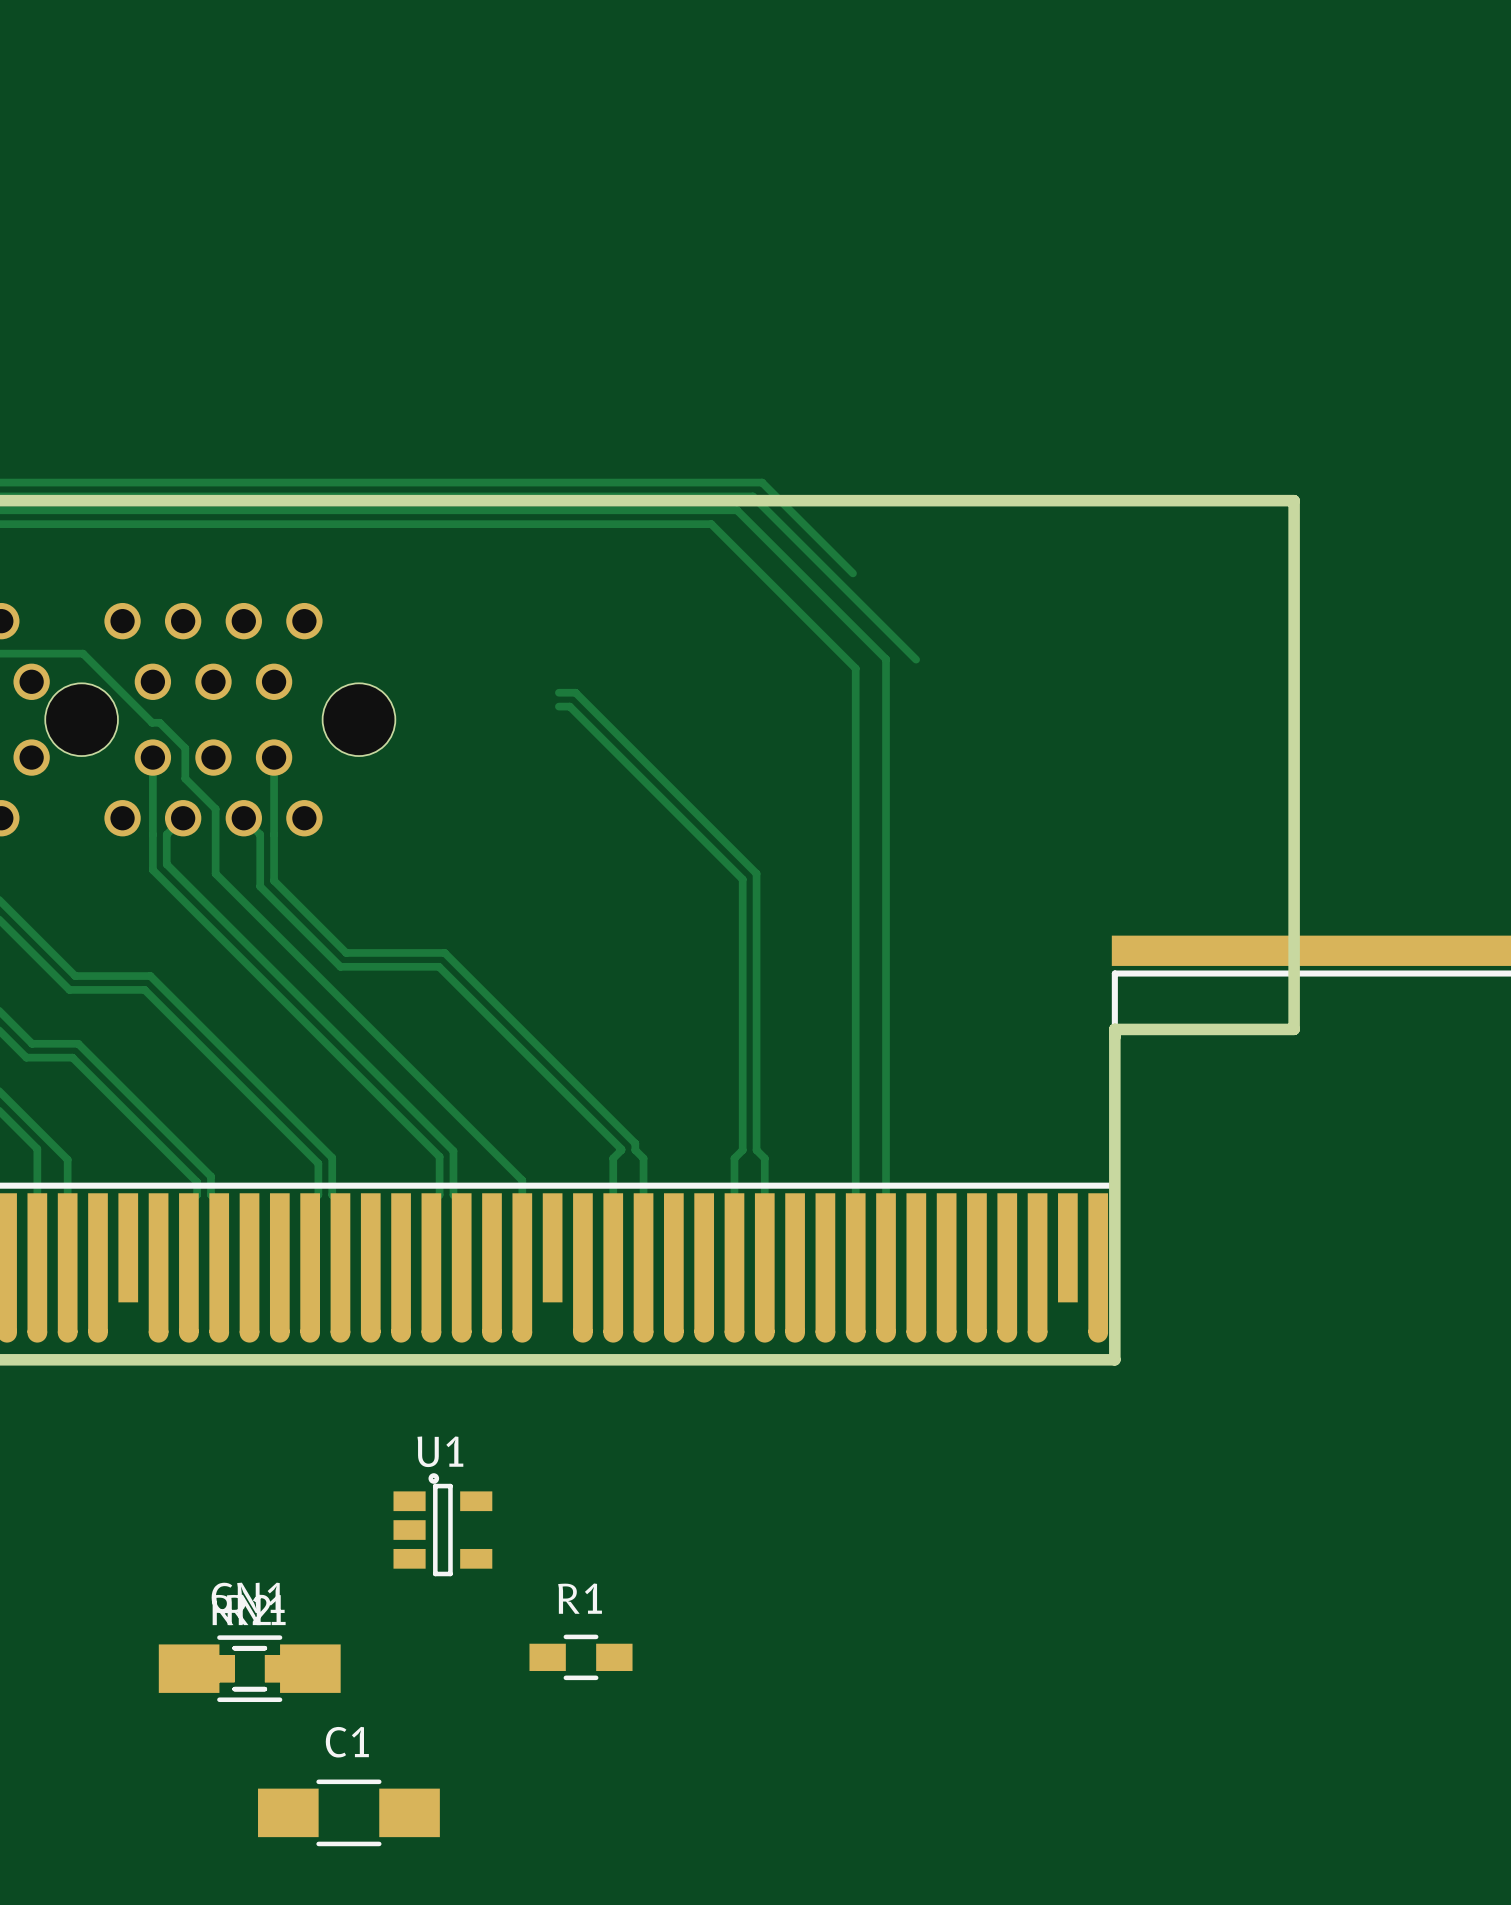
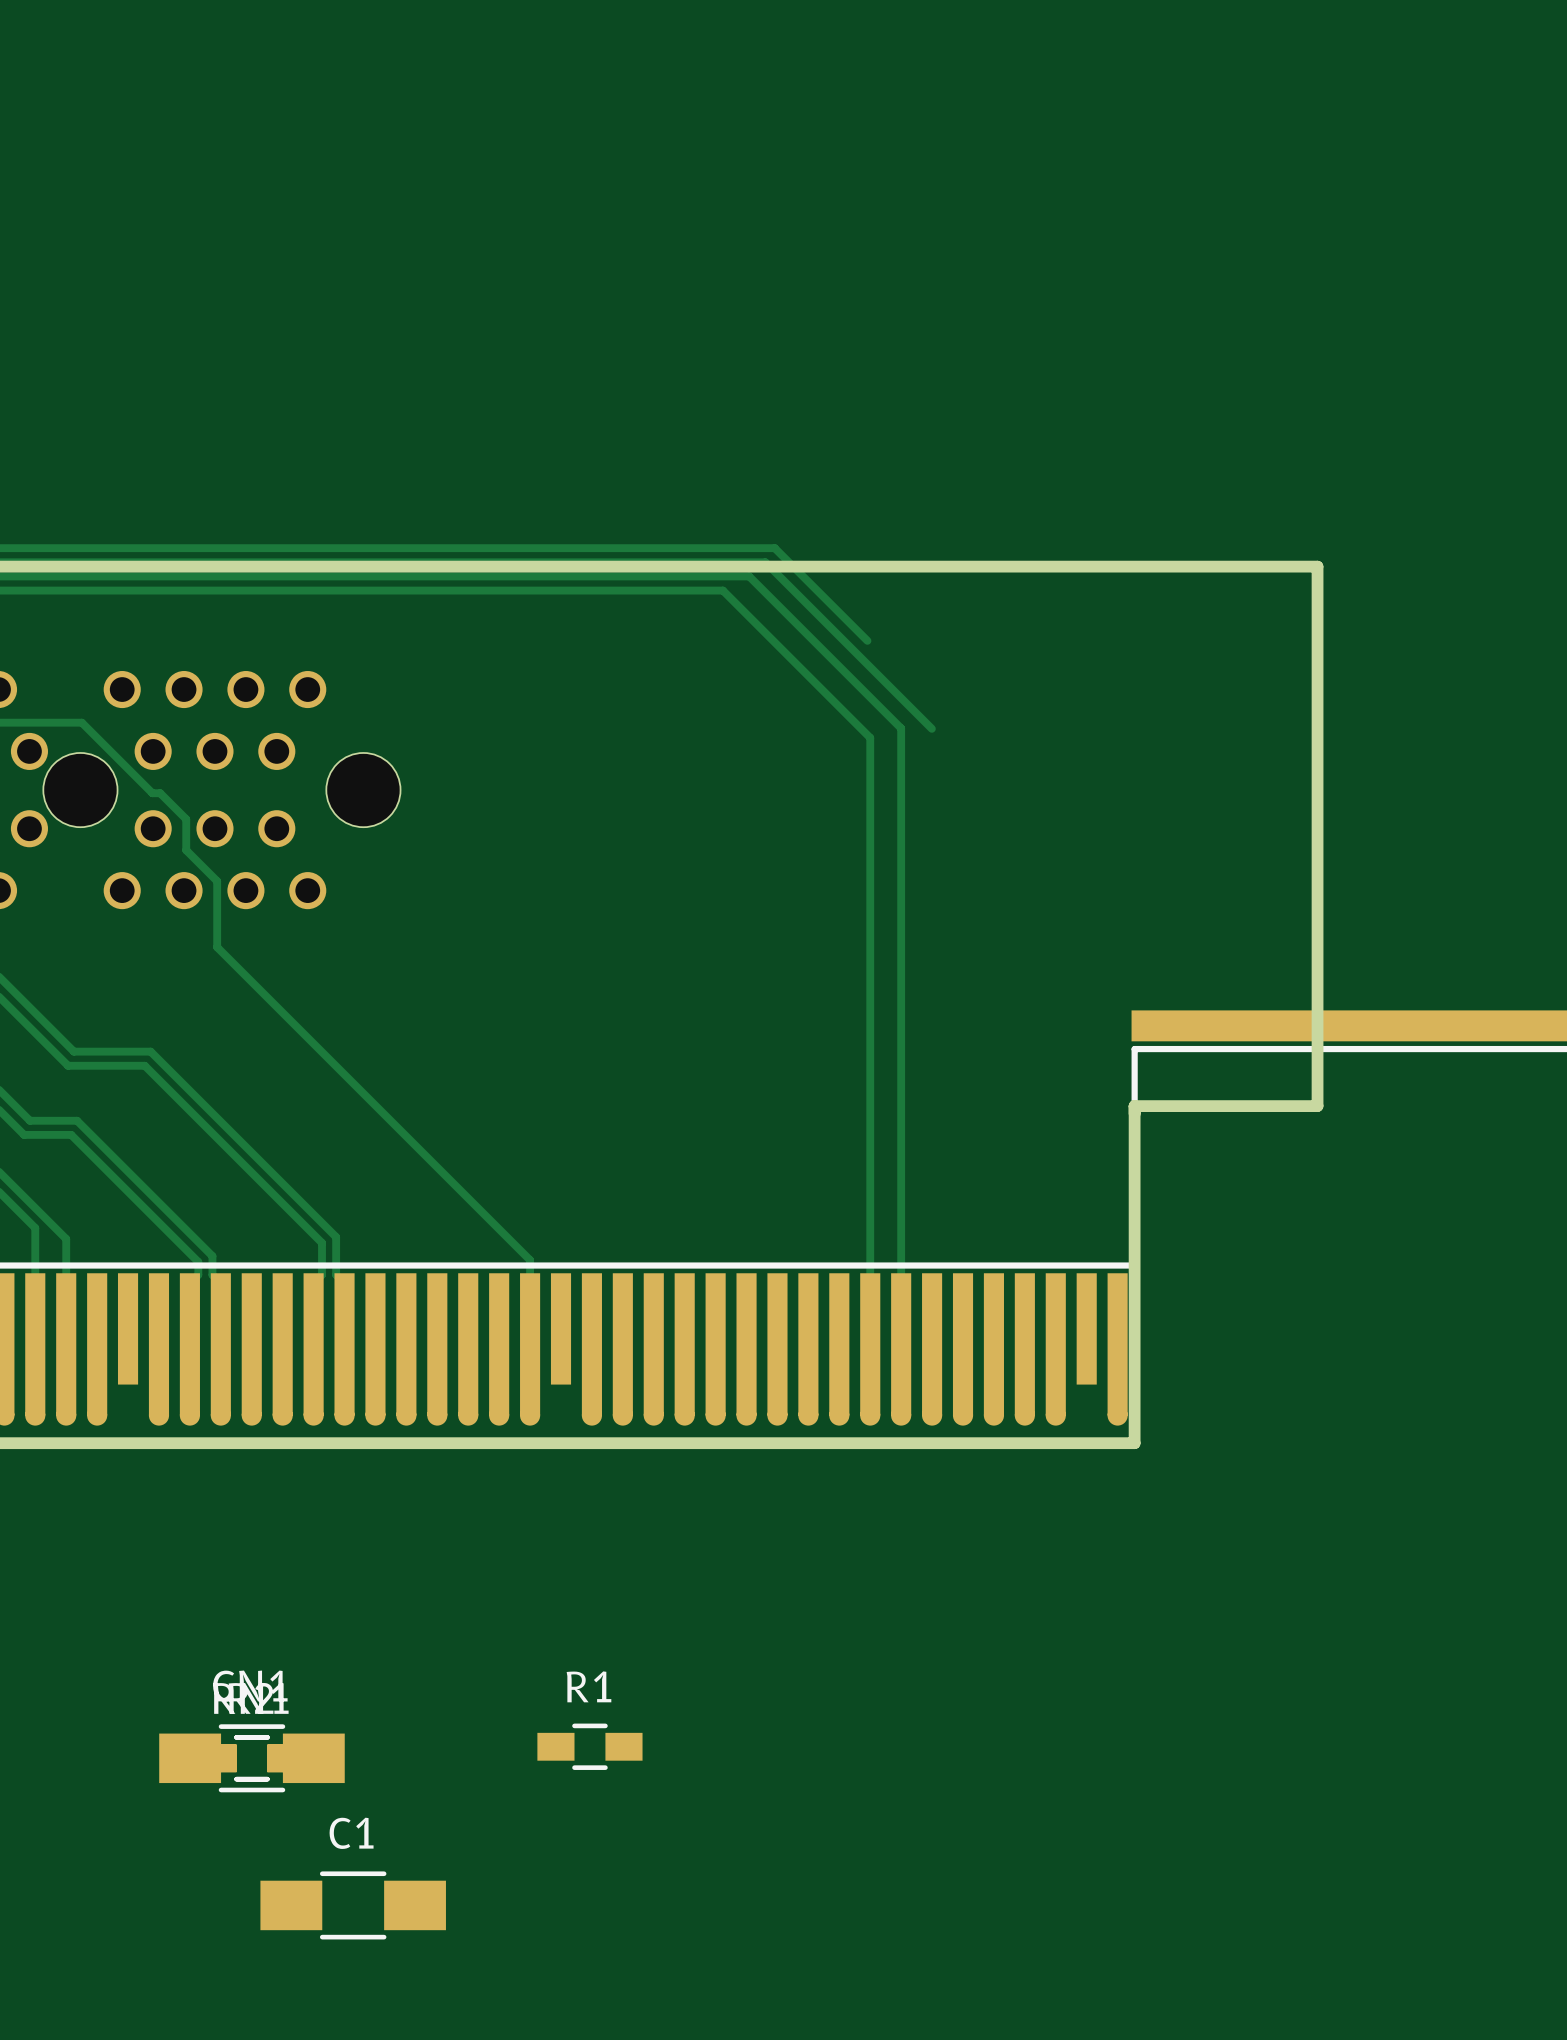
track: (558, 692) (575, 692) (756, 873) (756, 1150) (764, 1158) (764, 1262) -> none
track: (558, 706) (569, 706) (742, 879) (742, 1150) (734, 1158) (734, 1262) -> none
track: (152, 757) (152, 870) (439, 1156) (439, 1194) (431, 1203) (431, 1262) -> none
track: (274, 757) (274, 880) (346, 952) (444, 952) (635, 1143) (635, 1150) (643, 1158) (643, 1262) -> none
track: (183, 818) (166, 834) (166, 864) (453, 1151) (453, 1194) (461, 1203) (461, 1262) -> none
track: (243, 818) (260, 834) (260, 886) (340, 966) (439, 966) (621, 1149) (613, 1158) (613, 1262) -> none
U1: (442, 1524) -> none

